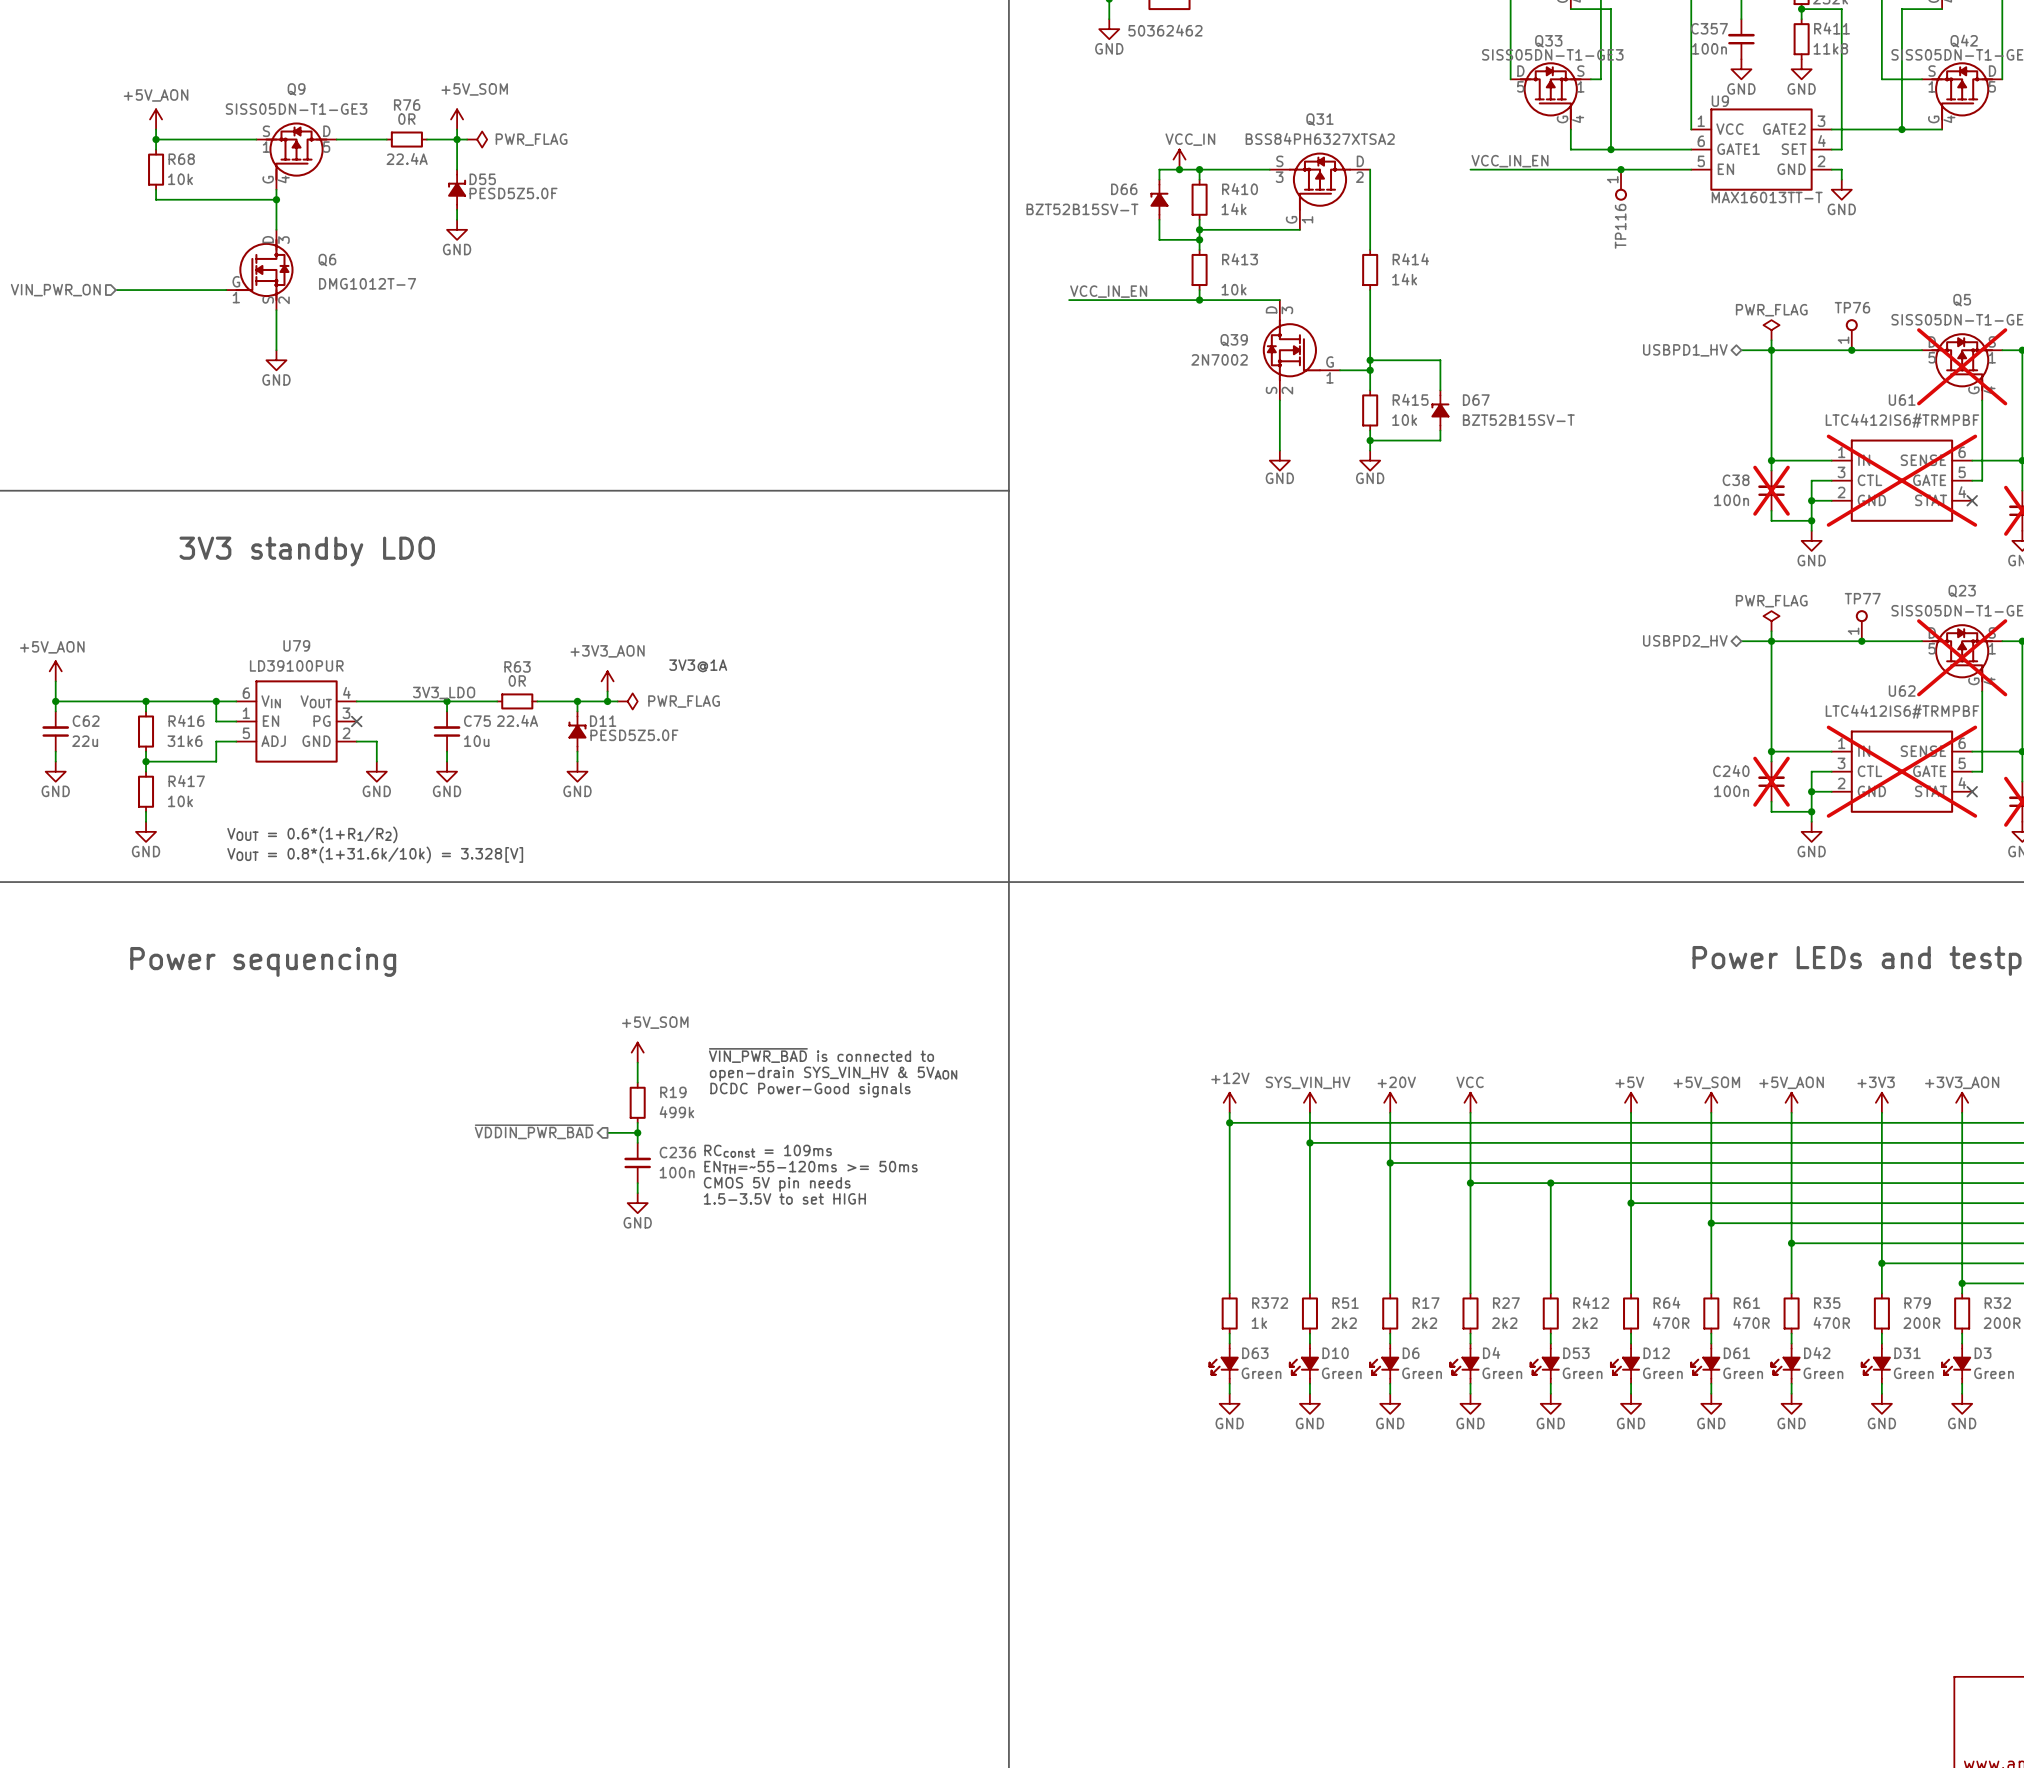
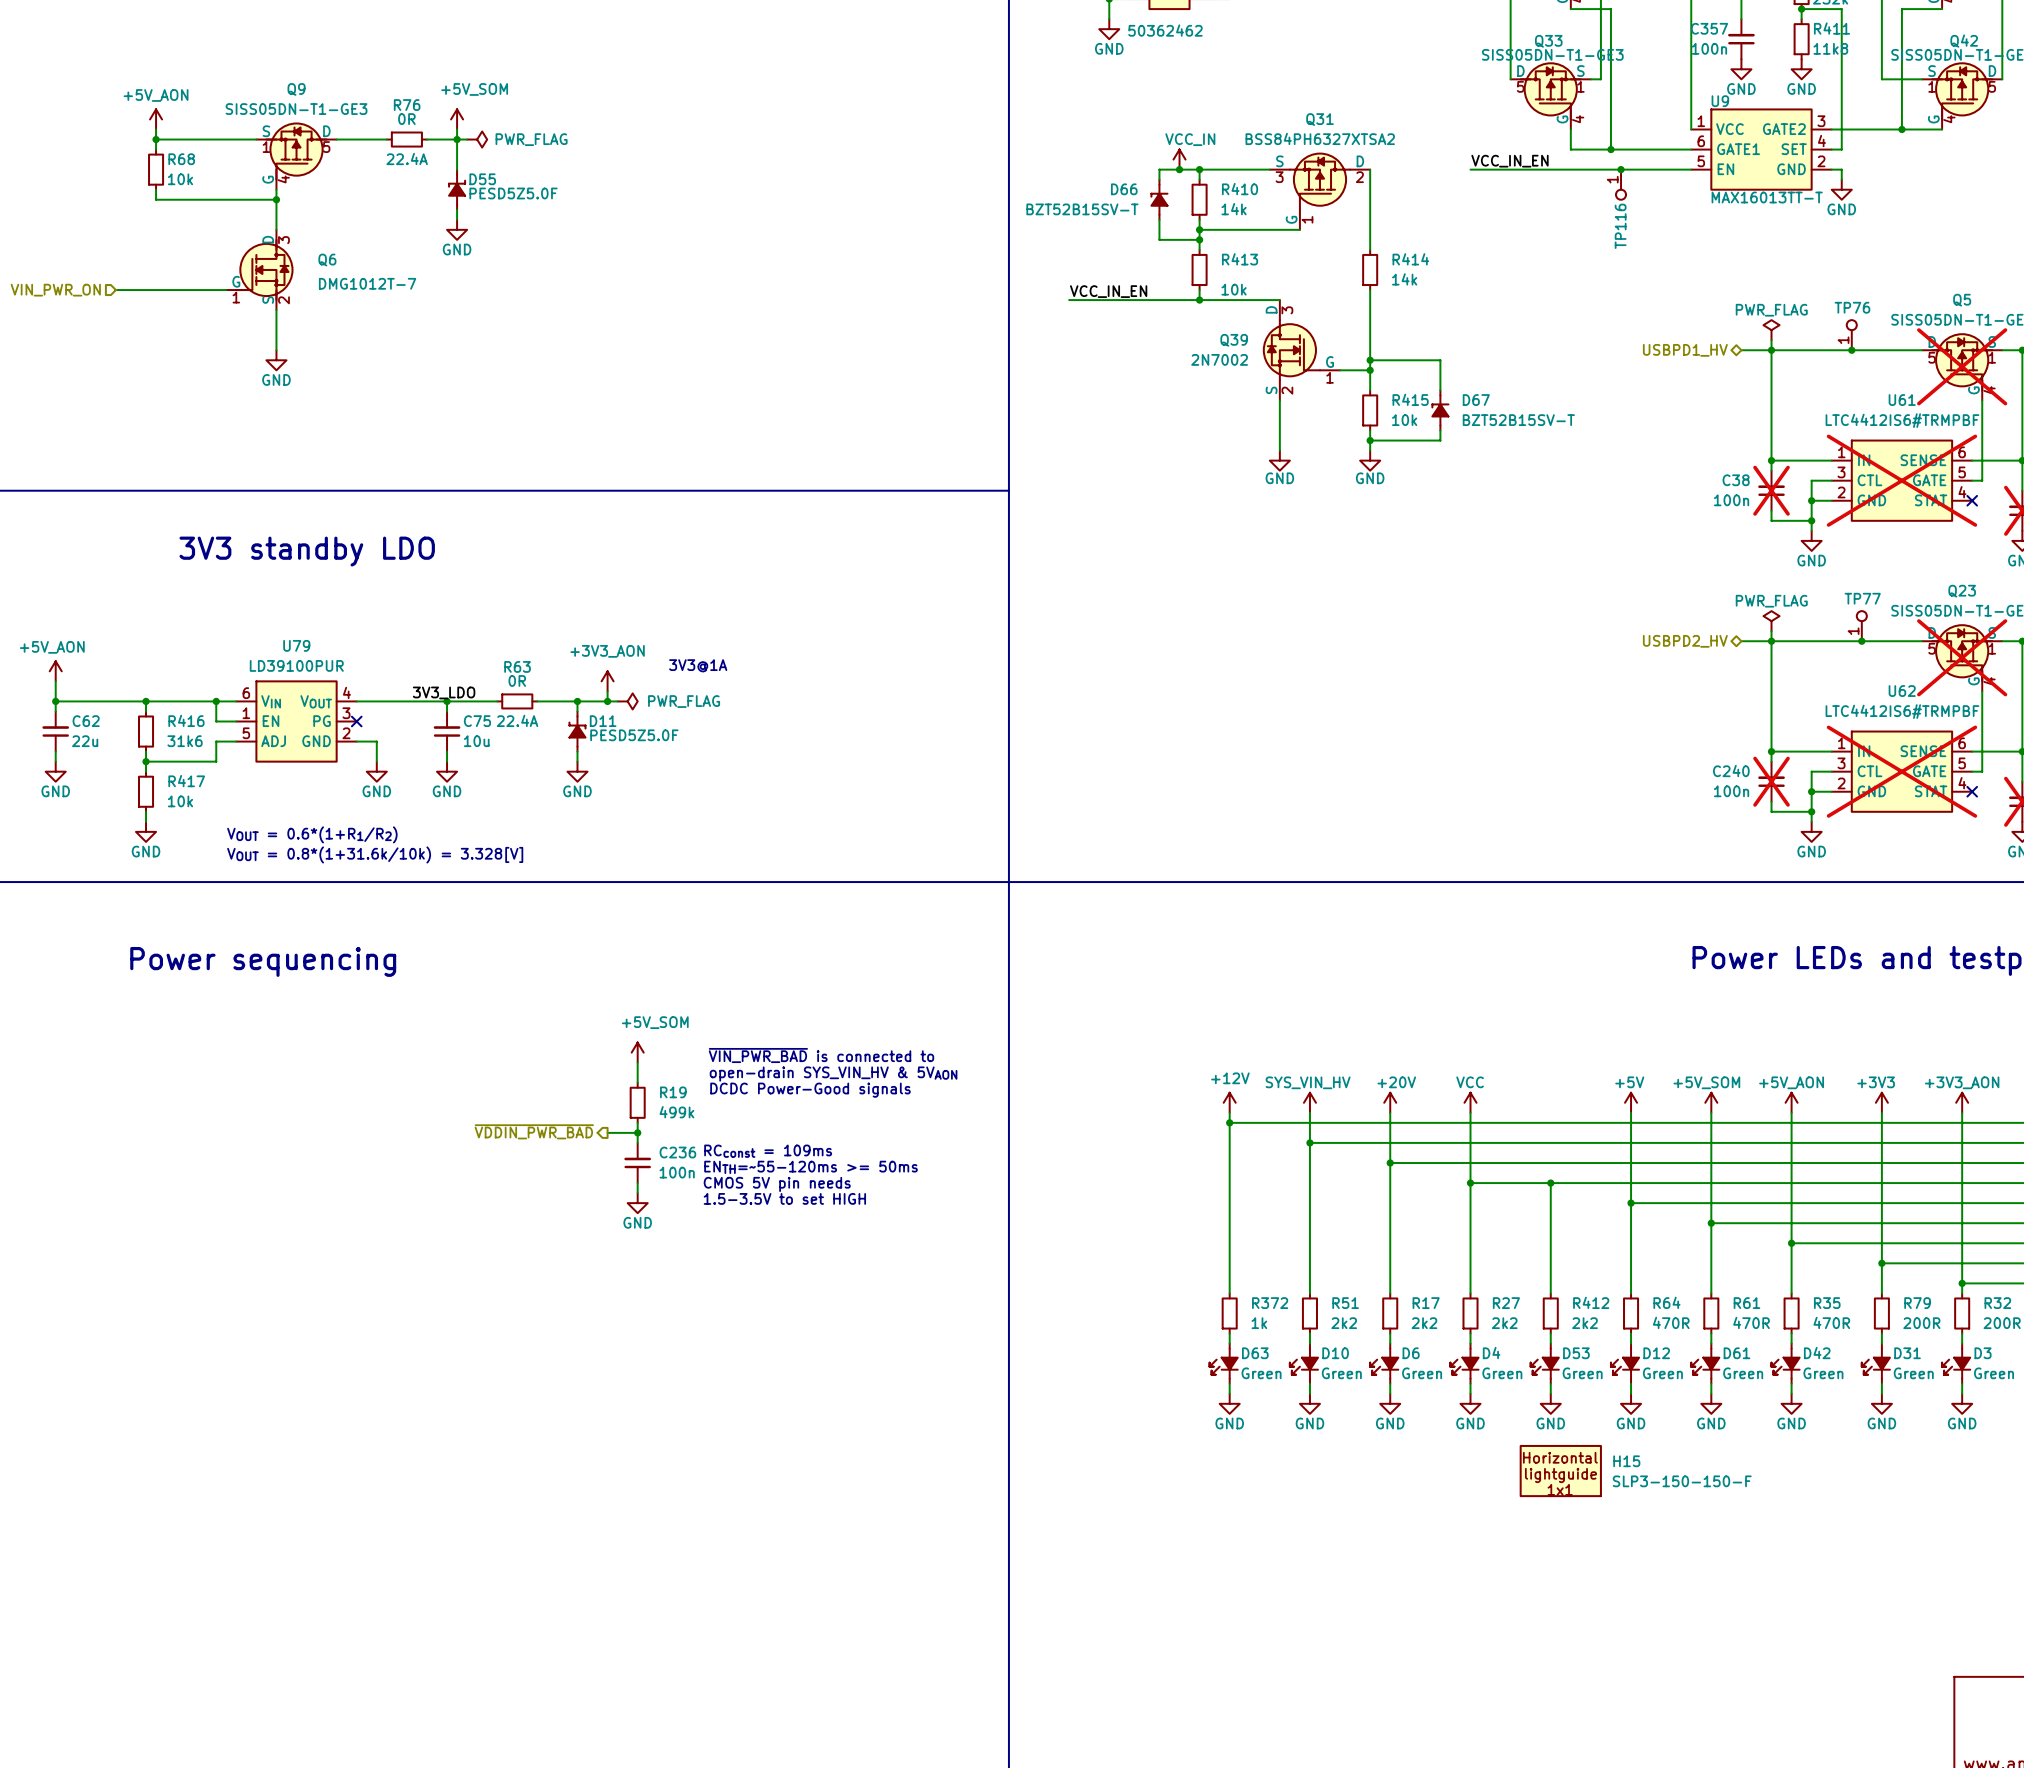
H15: none -> (1560, 1471)

